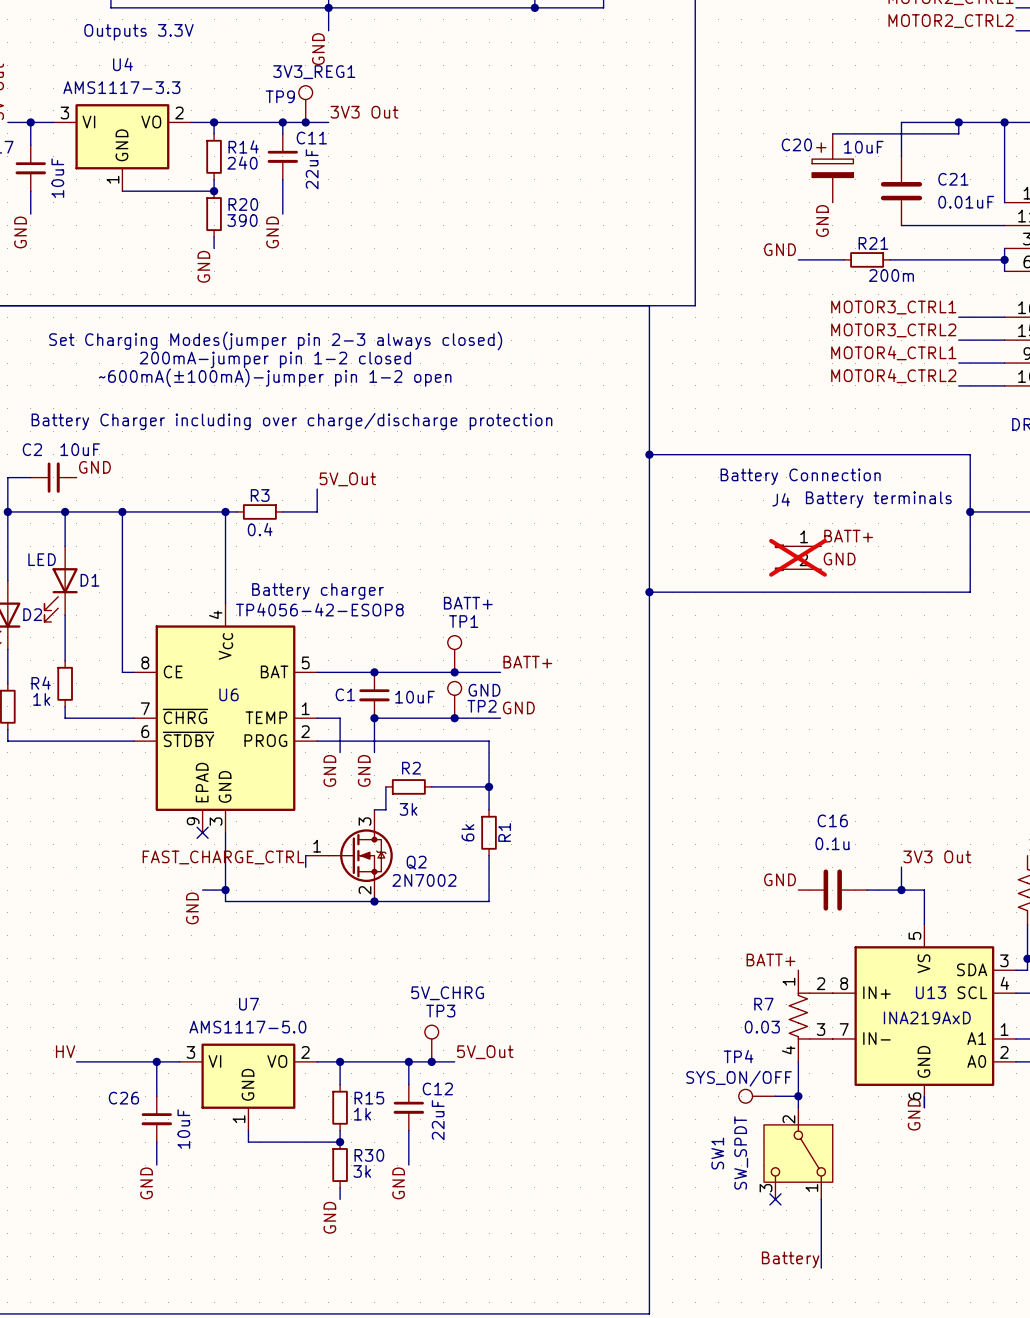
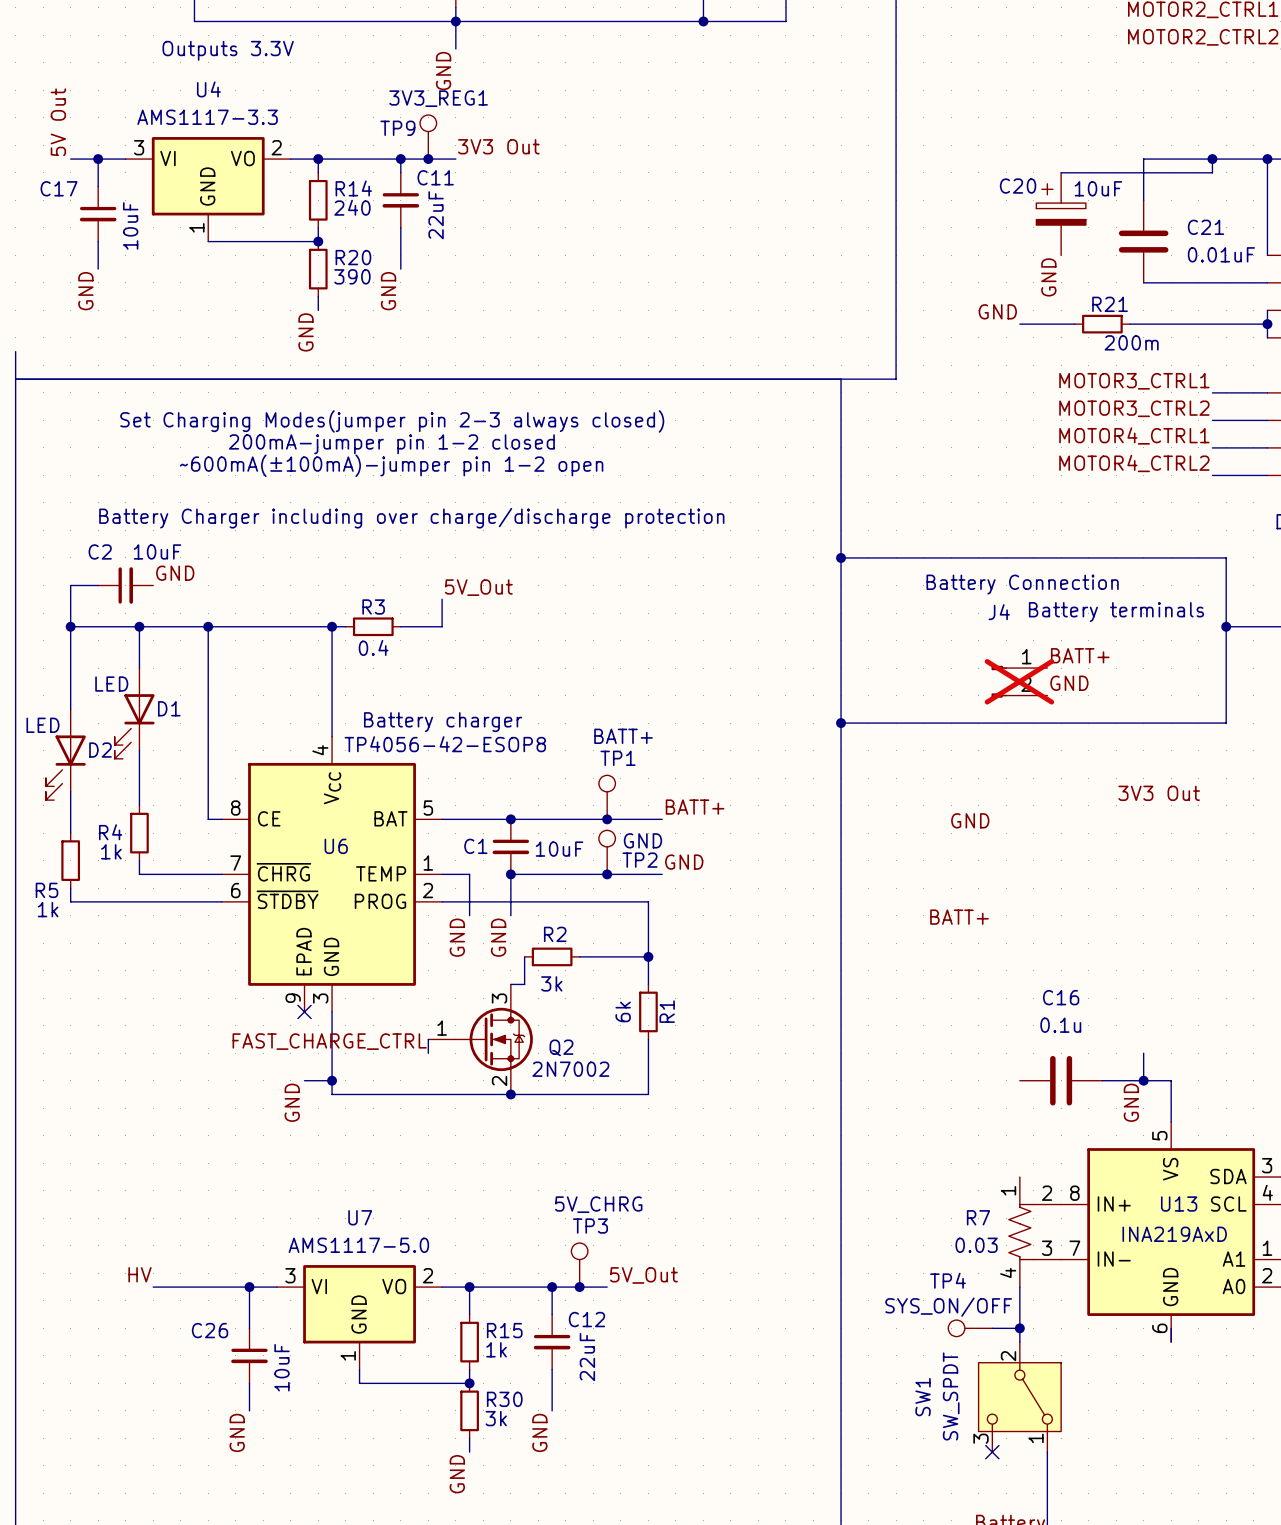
label: none -> 3V3 Out (1159, 793)
label: none -> GND (970, 820)
label: 3V3 Out (937, 856) -> none
label rotation: 0° (780, 879) -> 90° counterclockwise (1131, 1102)
label position: GND (780, 879) -> GND (1131, 1102)
label position: BATT+ (771, 960) -> BATT+ (959, 917)
label: GND (914, 1114) -> none

